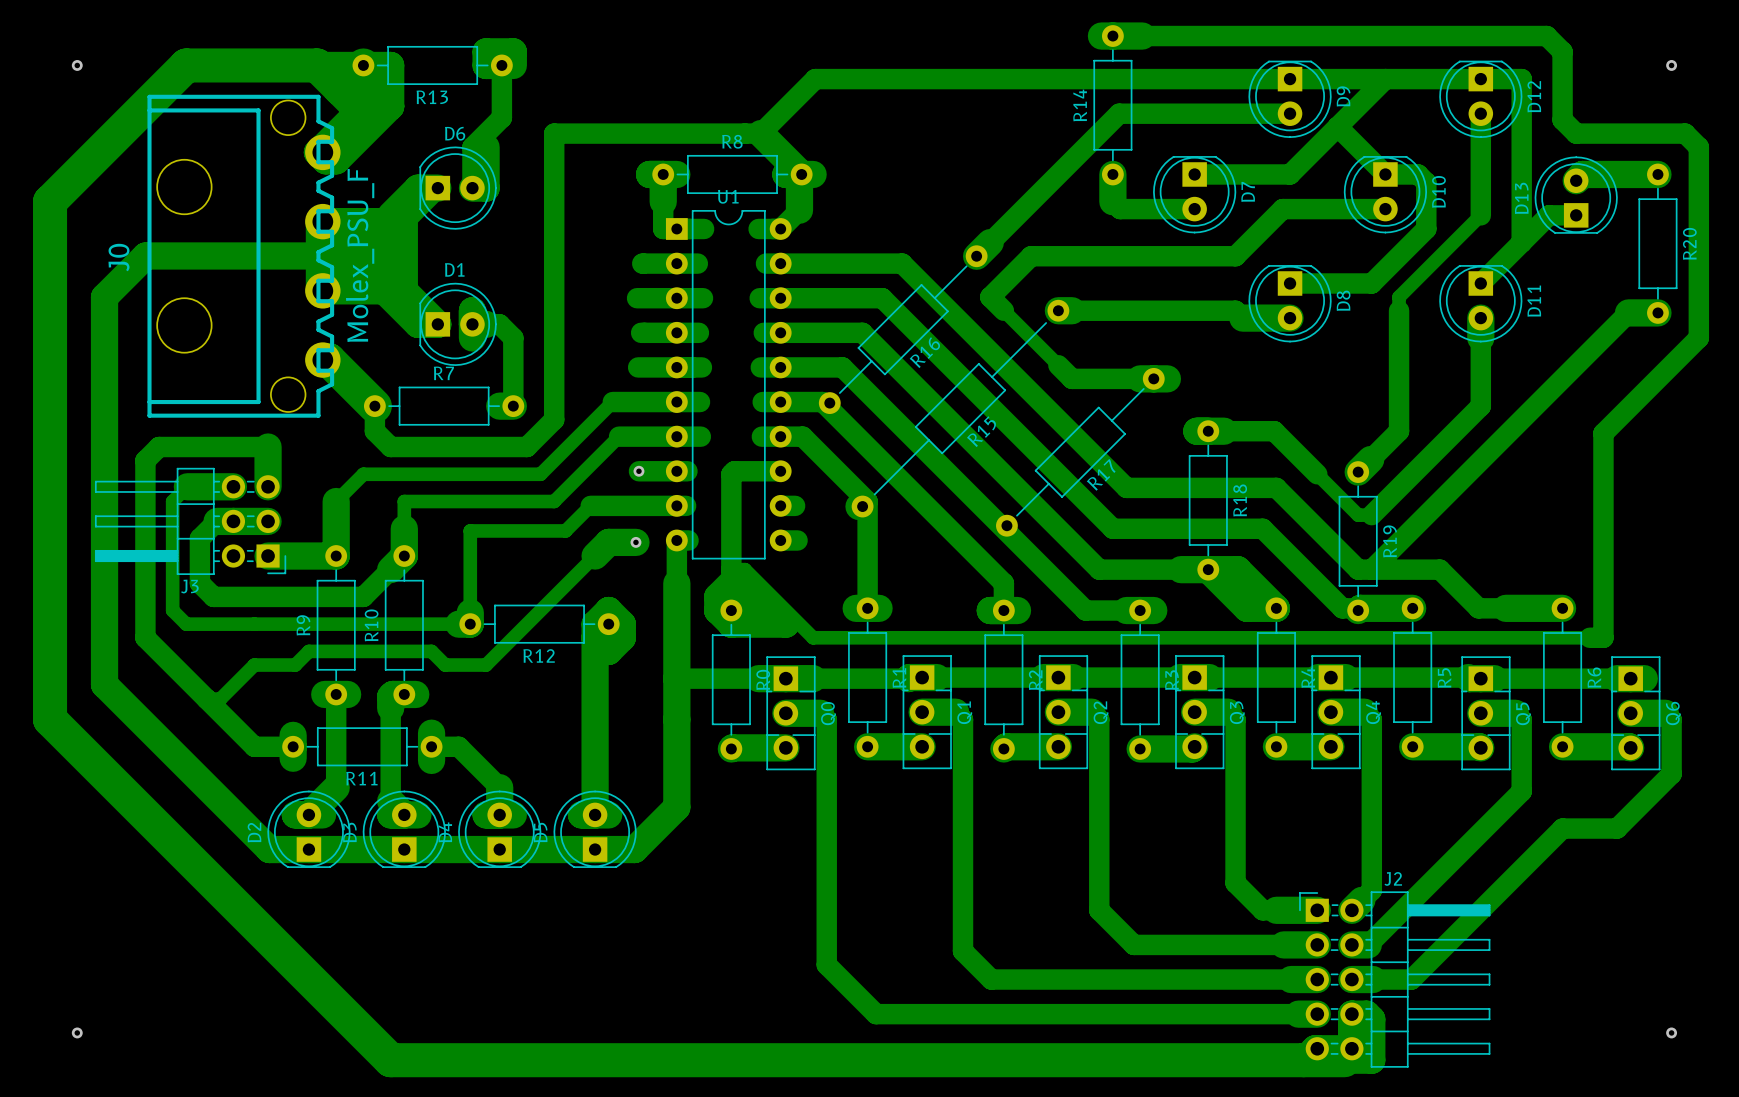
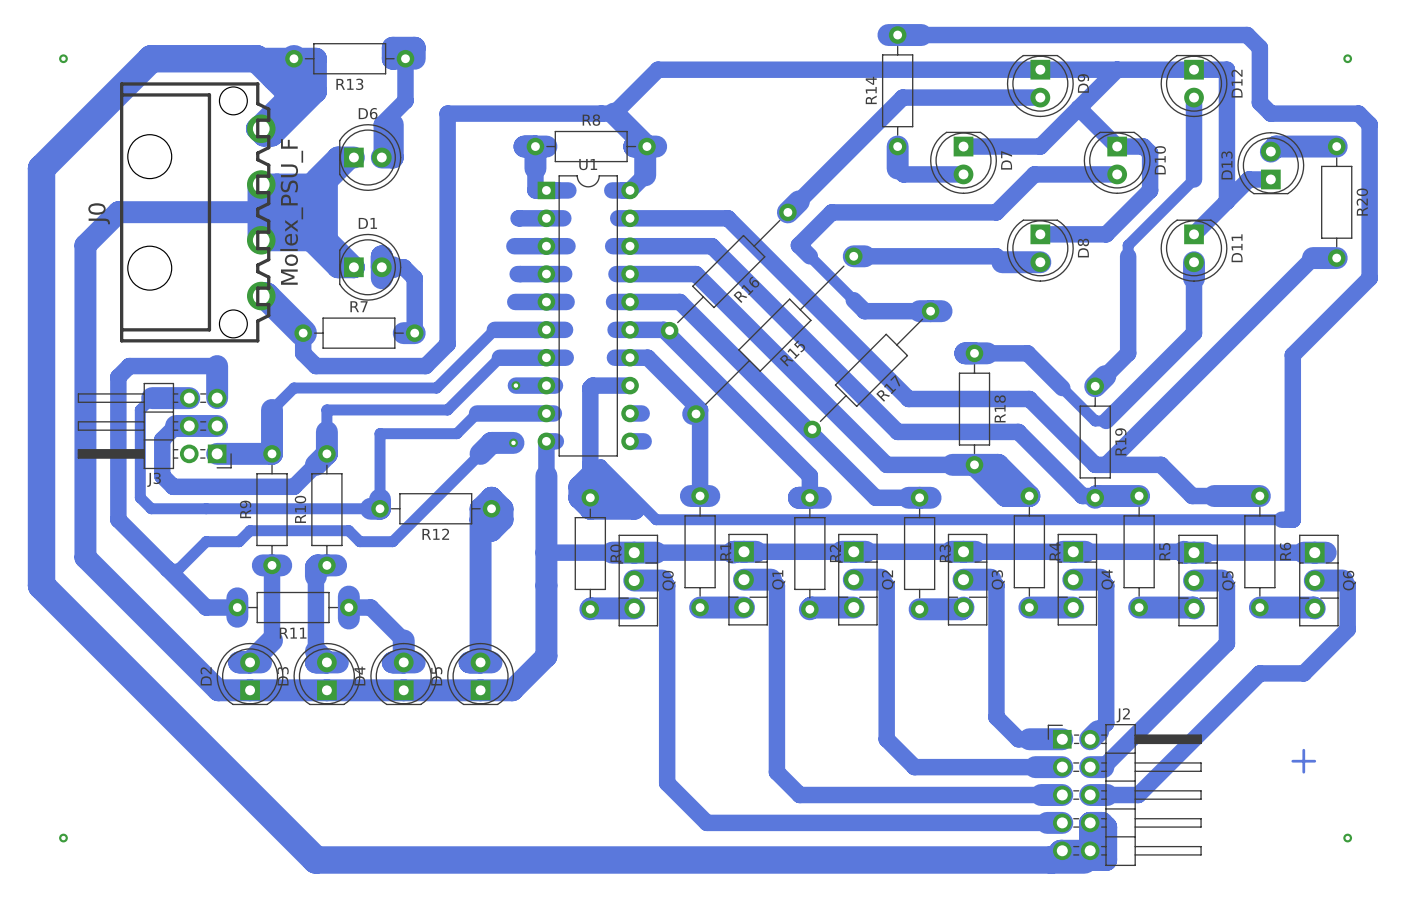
bottom track: none -> (1303, 750) (1303, 772)
bottom track: none -> (1292, 761) (1314, 761)

